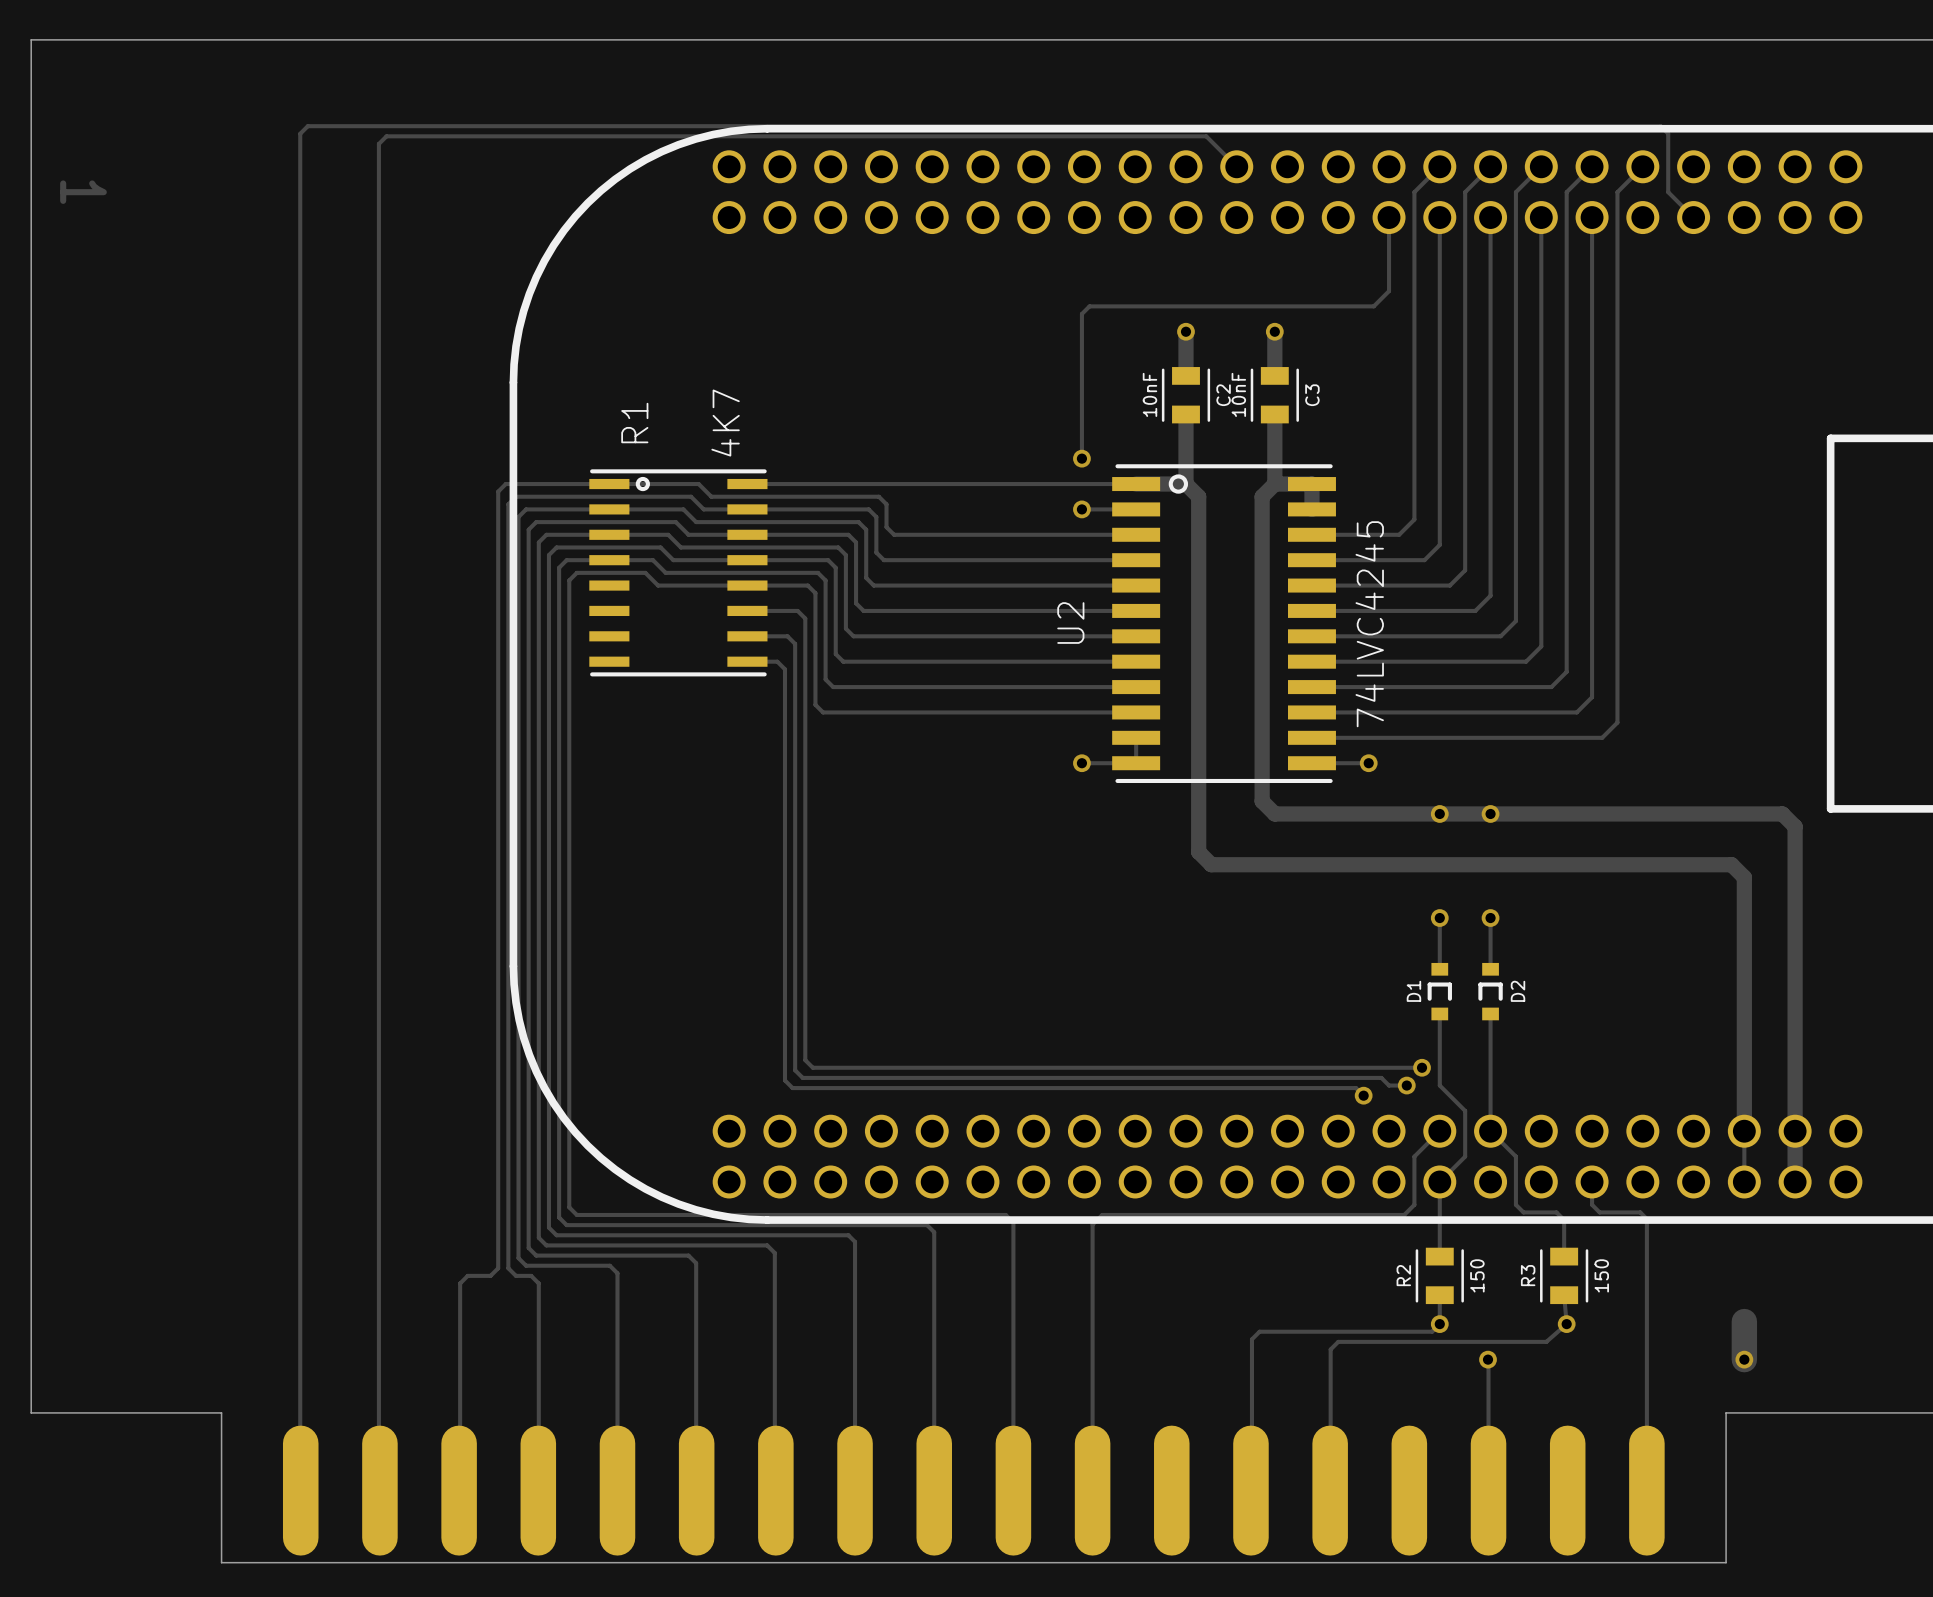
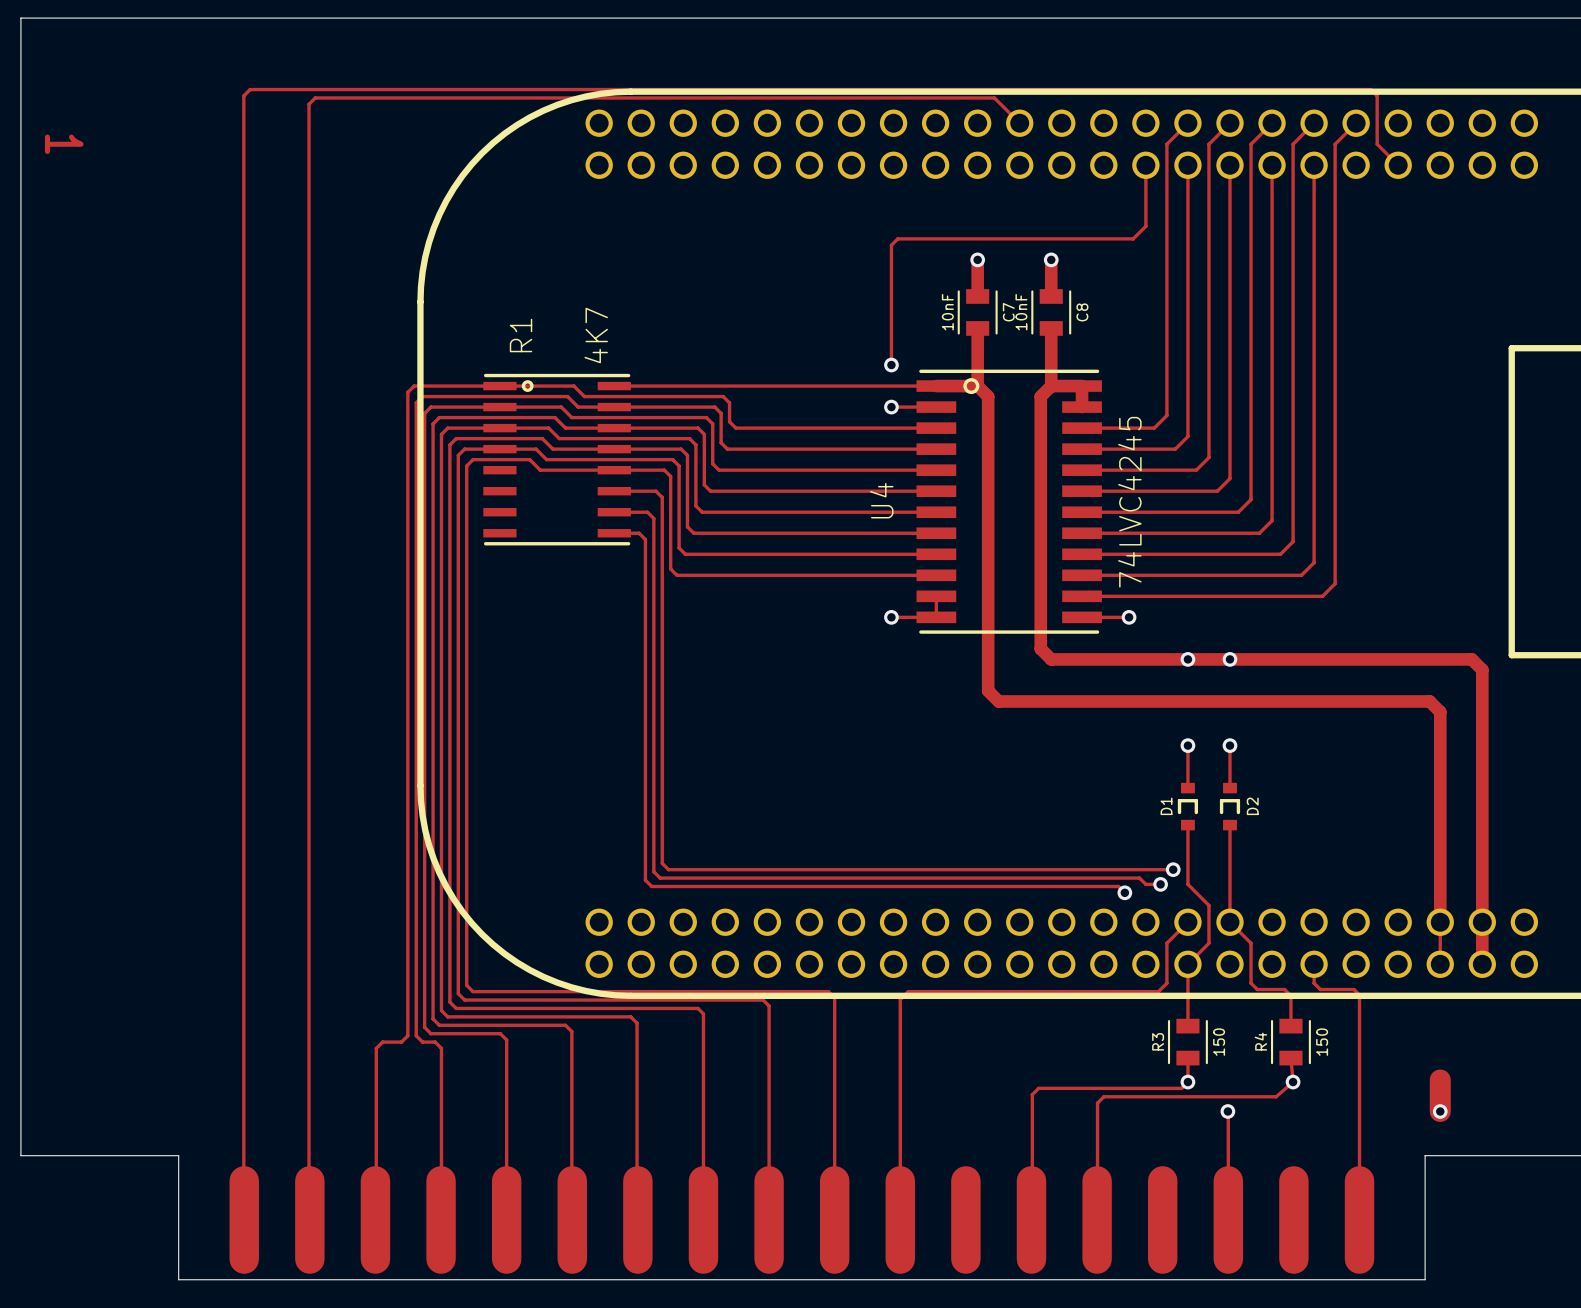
C2 name: C2 (1223, 395) -> C7 (1008, 312)
C3 name: C3 (1312, 395) -> C8 (1082, 312)
U2 name: U2 (1070, 623) -> U4 (881, 500)
R2 name: R2 (1403, 1275) -> R3 (1158, 1041)
R3 name: R3 (1528, 1275) -> R4 (1260, 1041)

